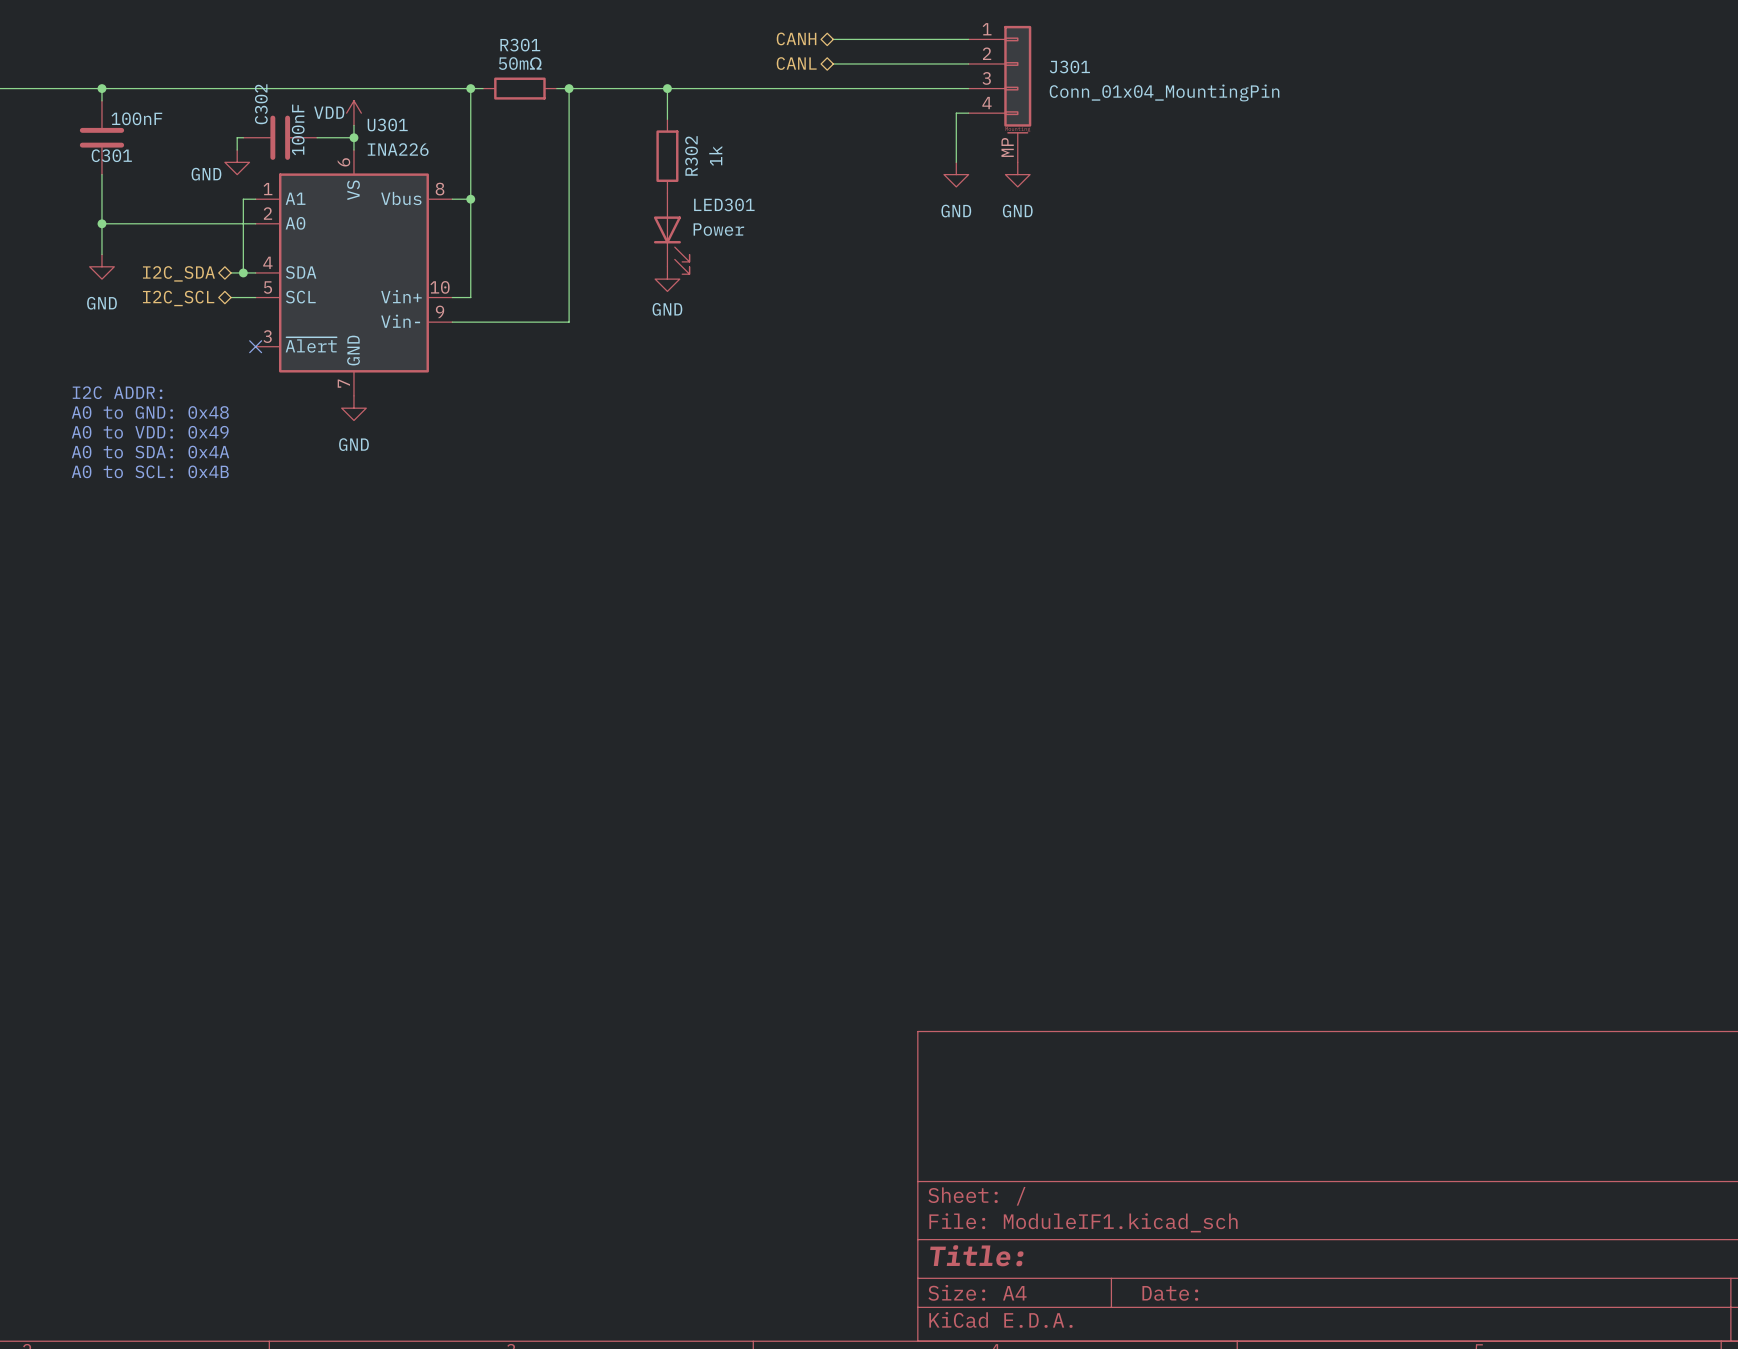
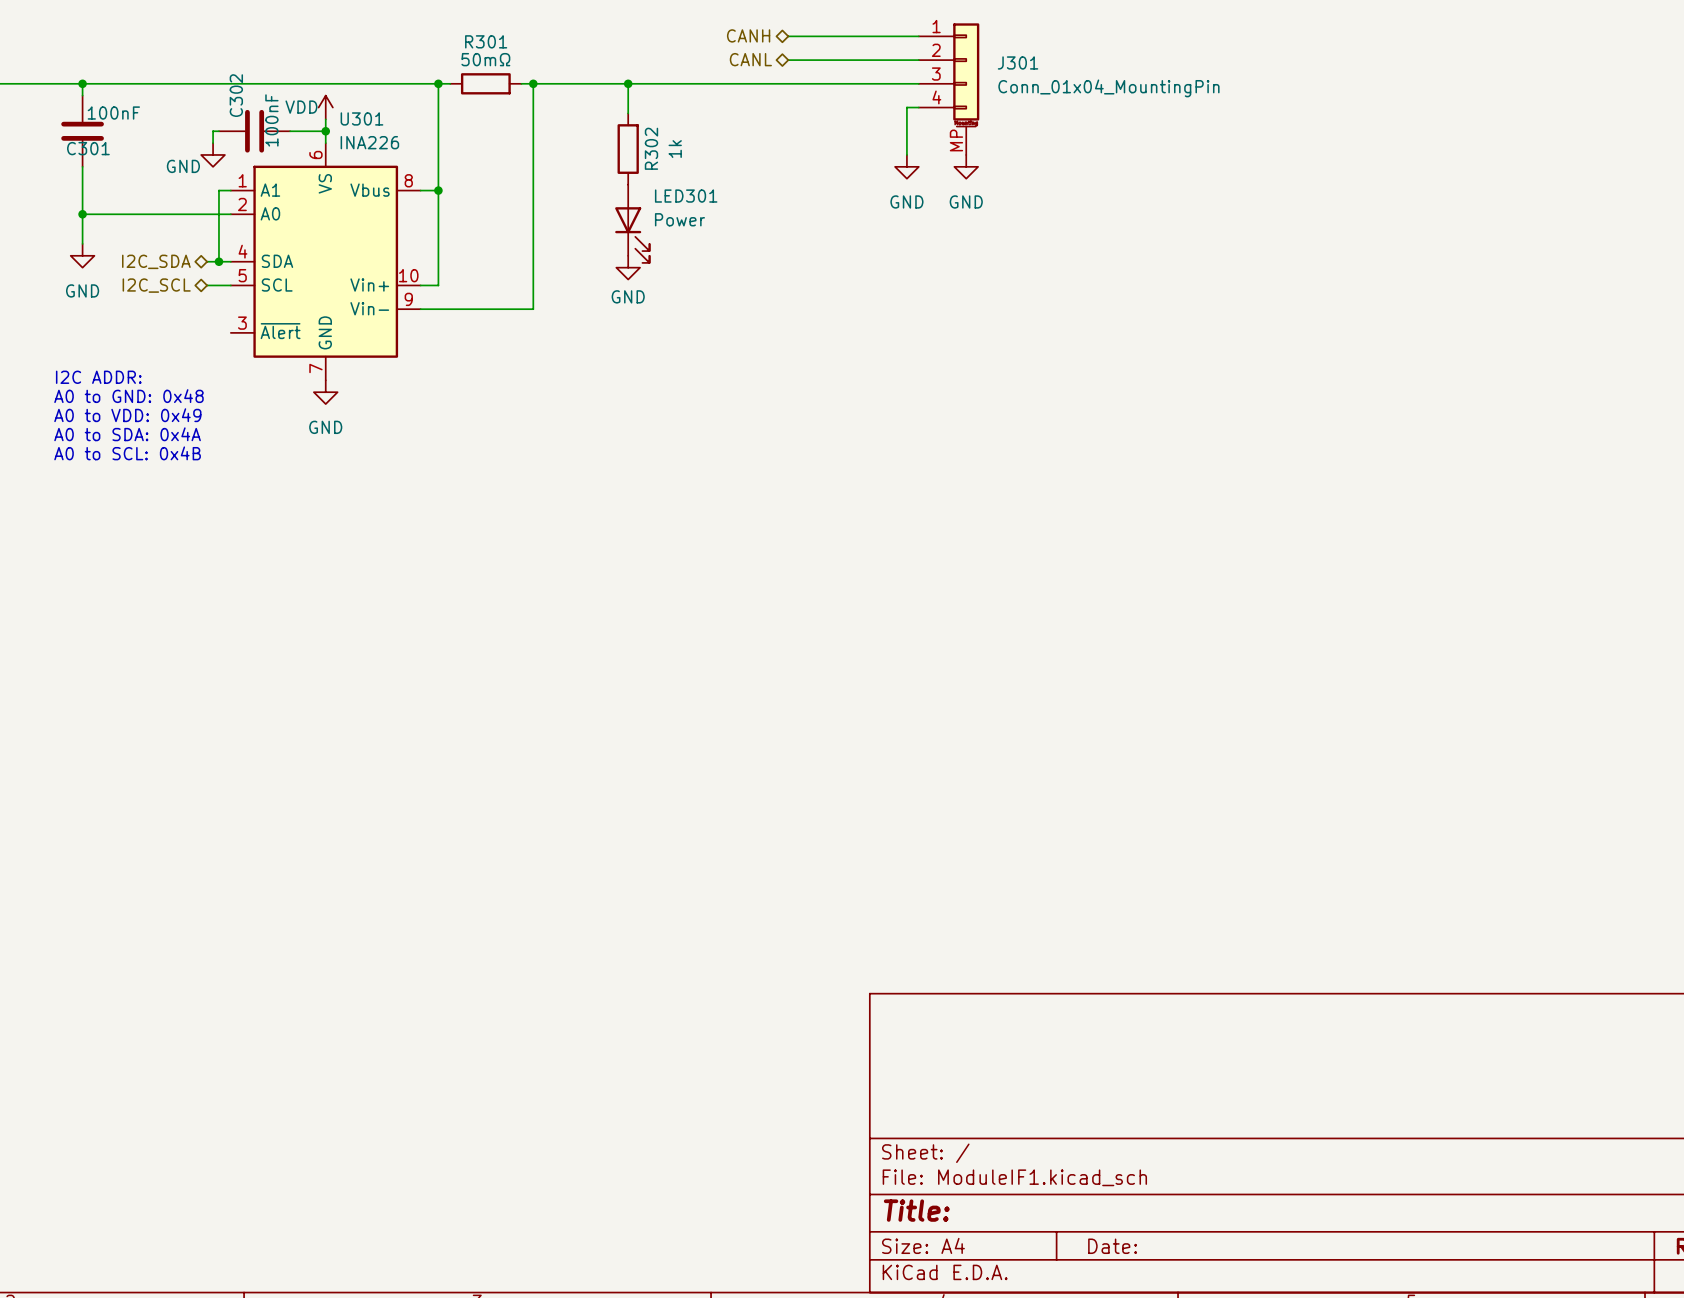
no-connect mark: (255, 346) -> none

